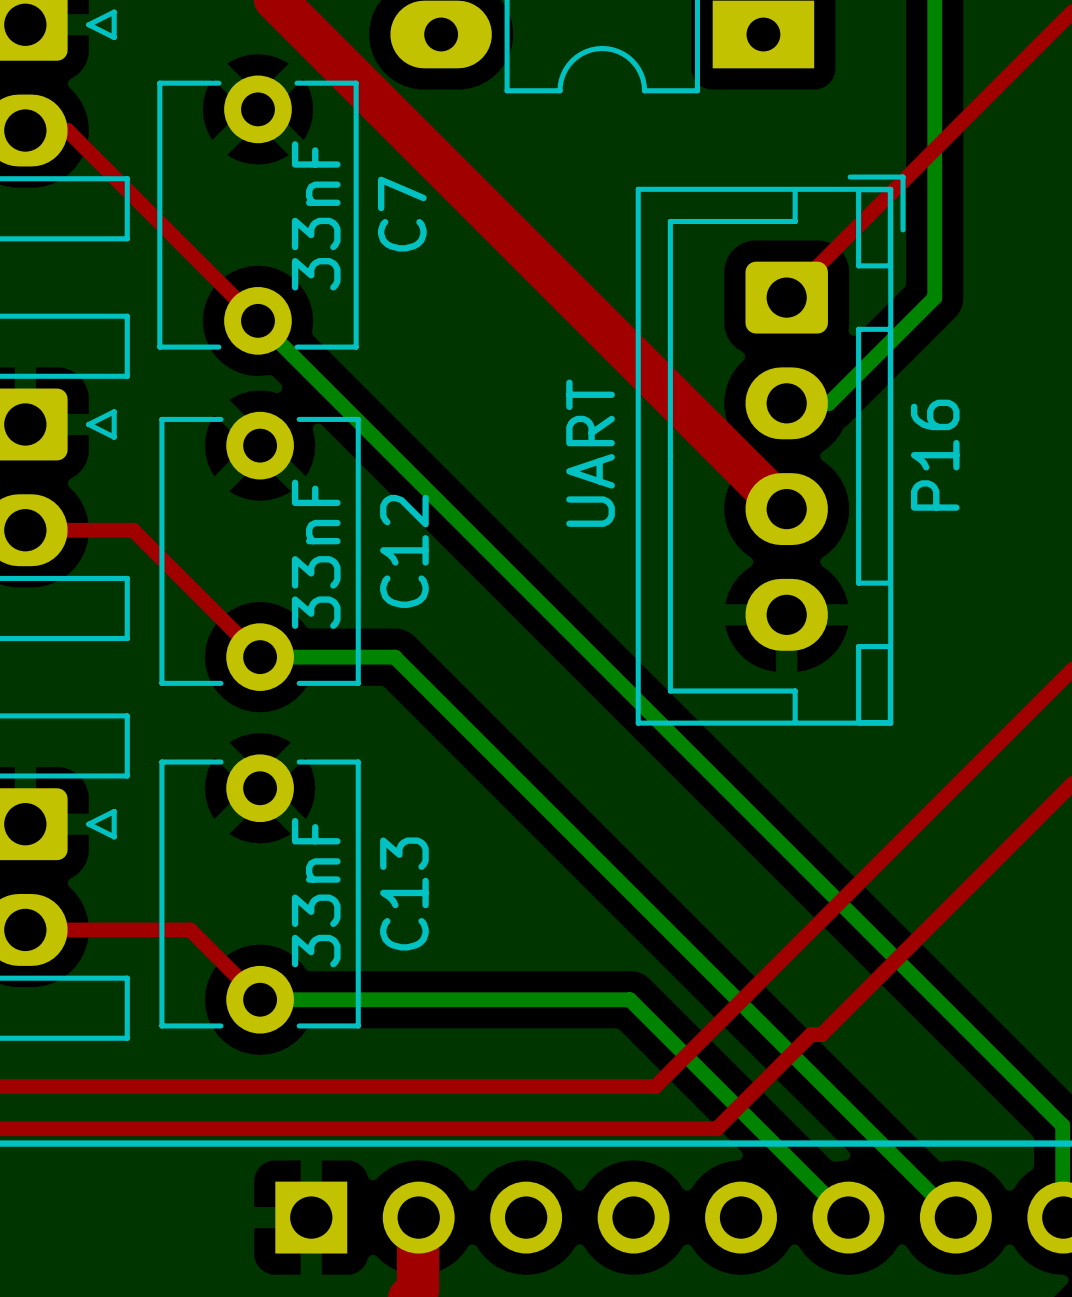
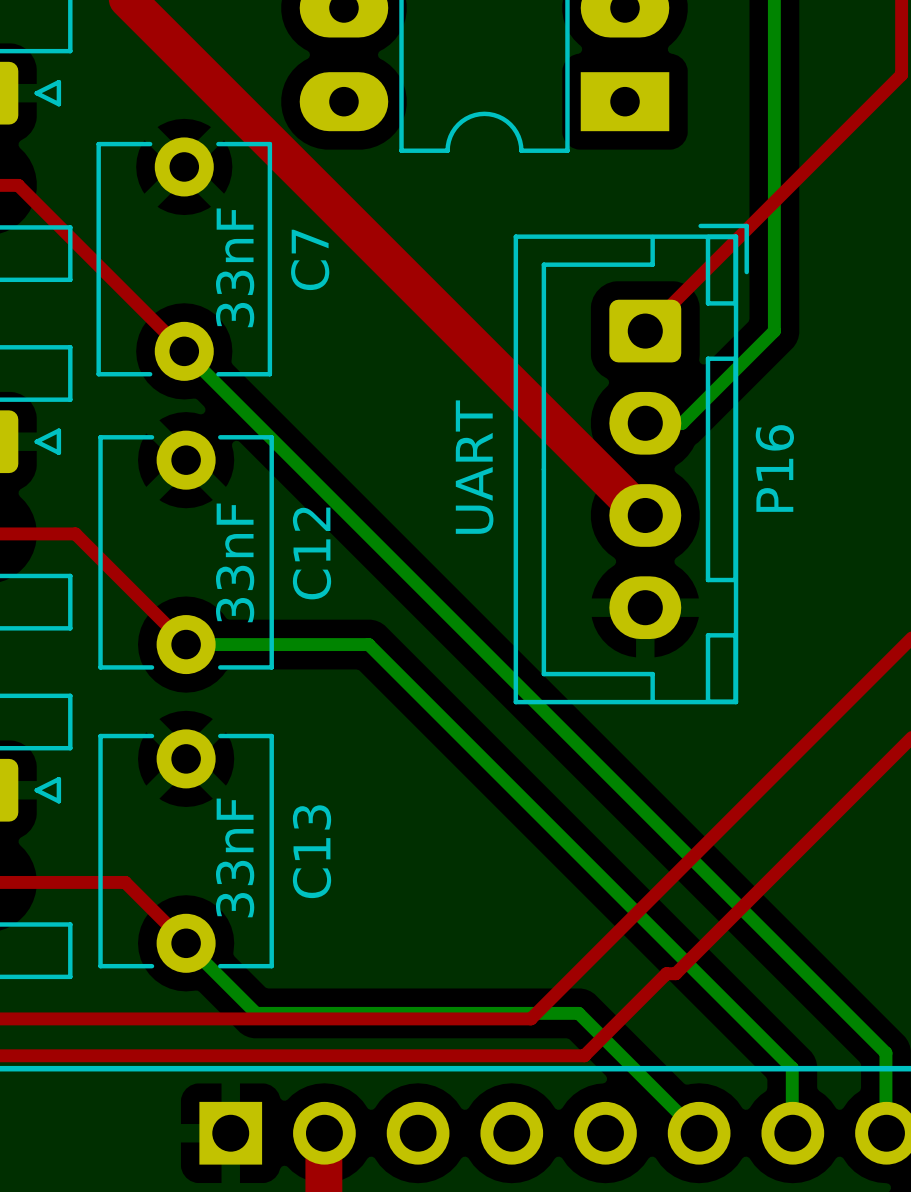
bottom track: (394, 657) (955, 1217) -> (303, 644) (368, 644) (792, 1068) (792, 1133)
bottom track: (260, 999) (629, 999) (710, 1080) -> (186, 943) (256, 1013) (578, 1013)

